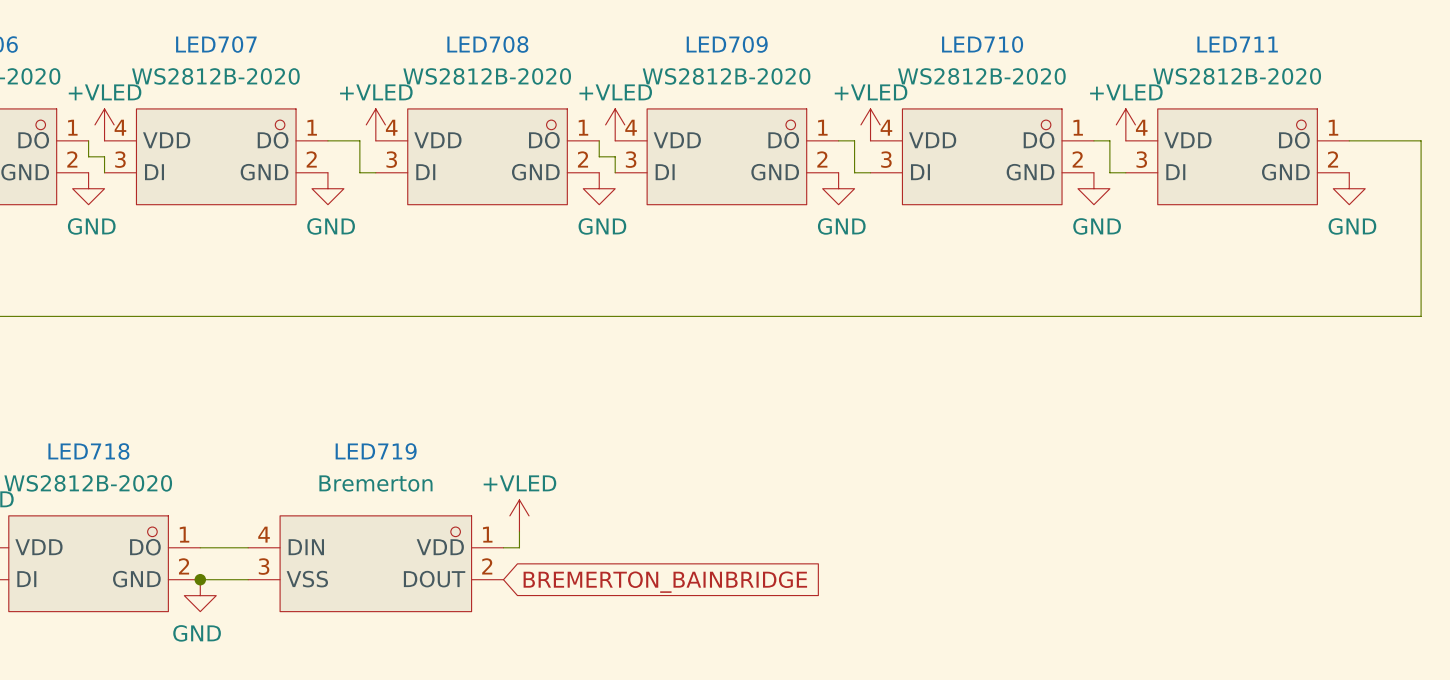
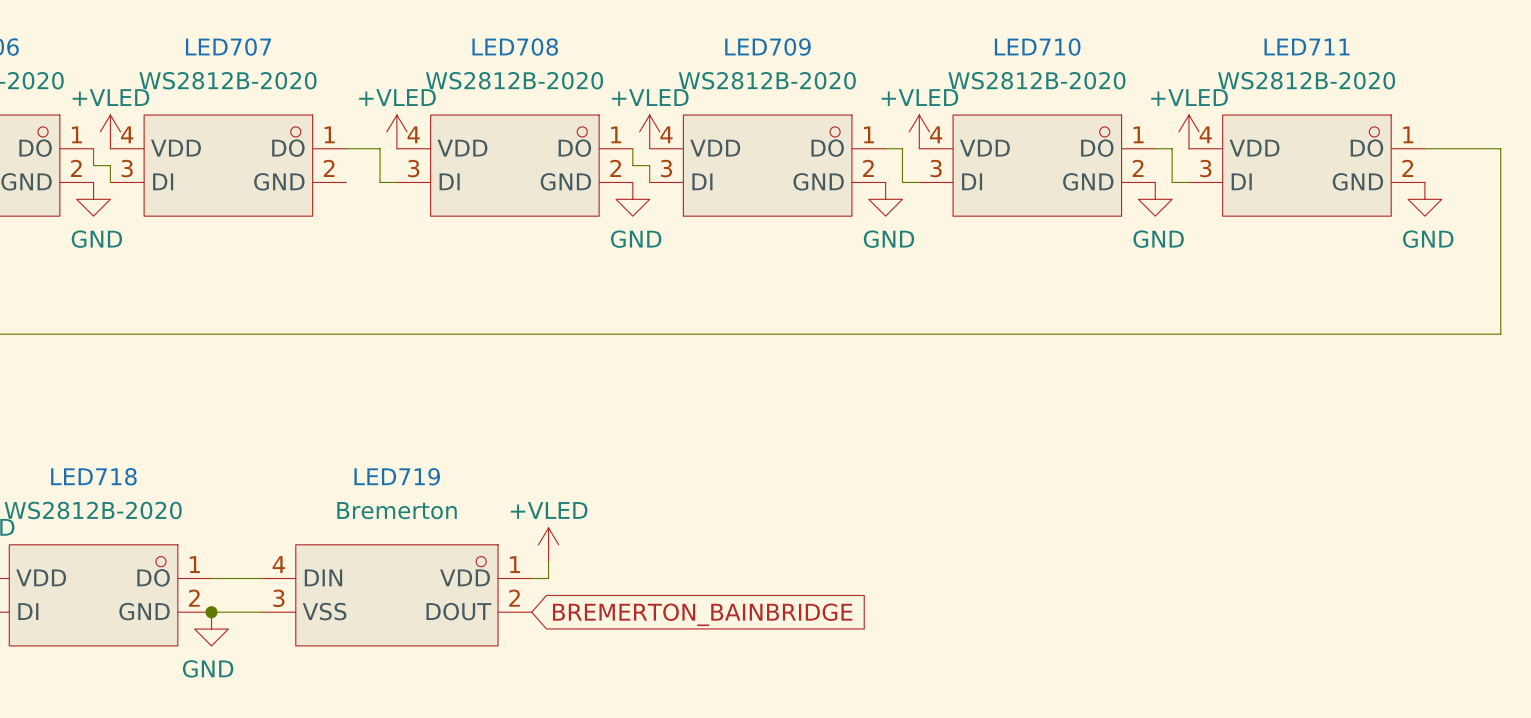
power symbol: GND (327, 188) -> none

